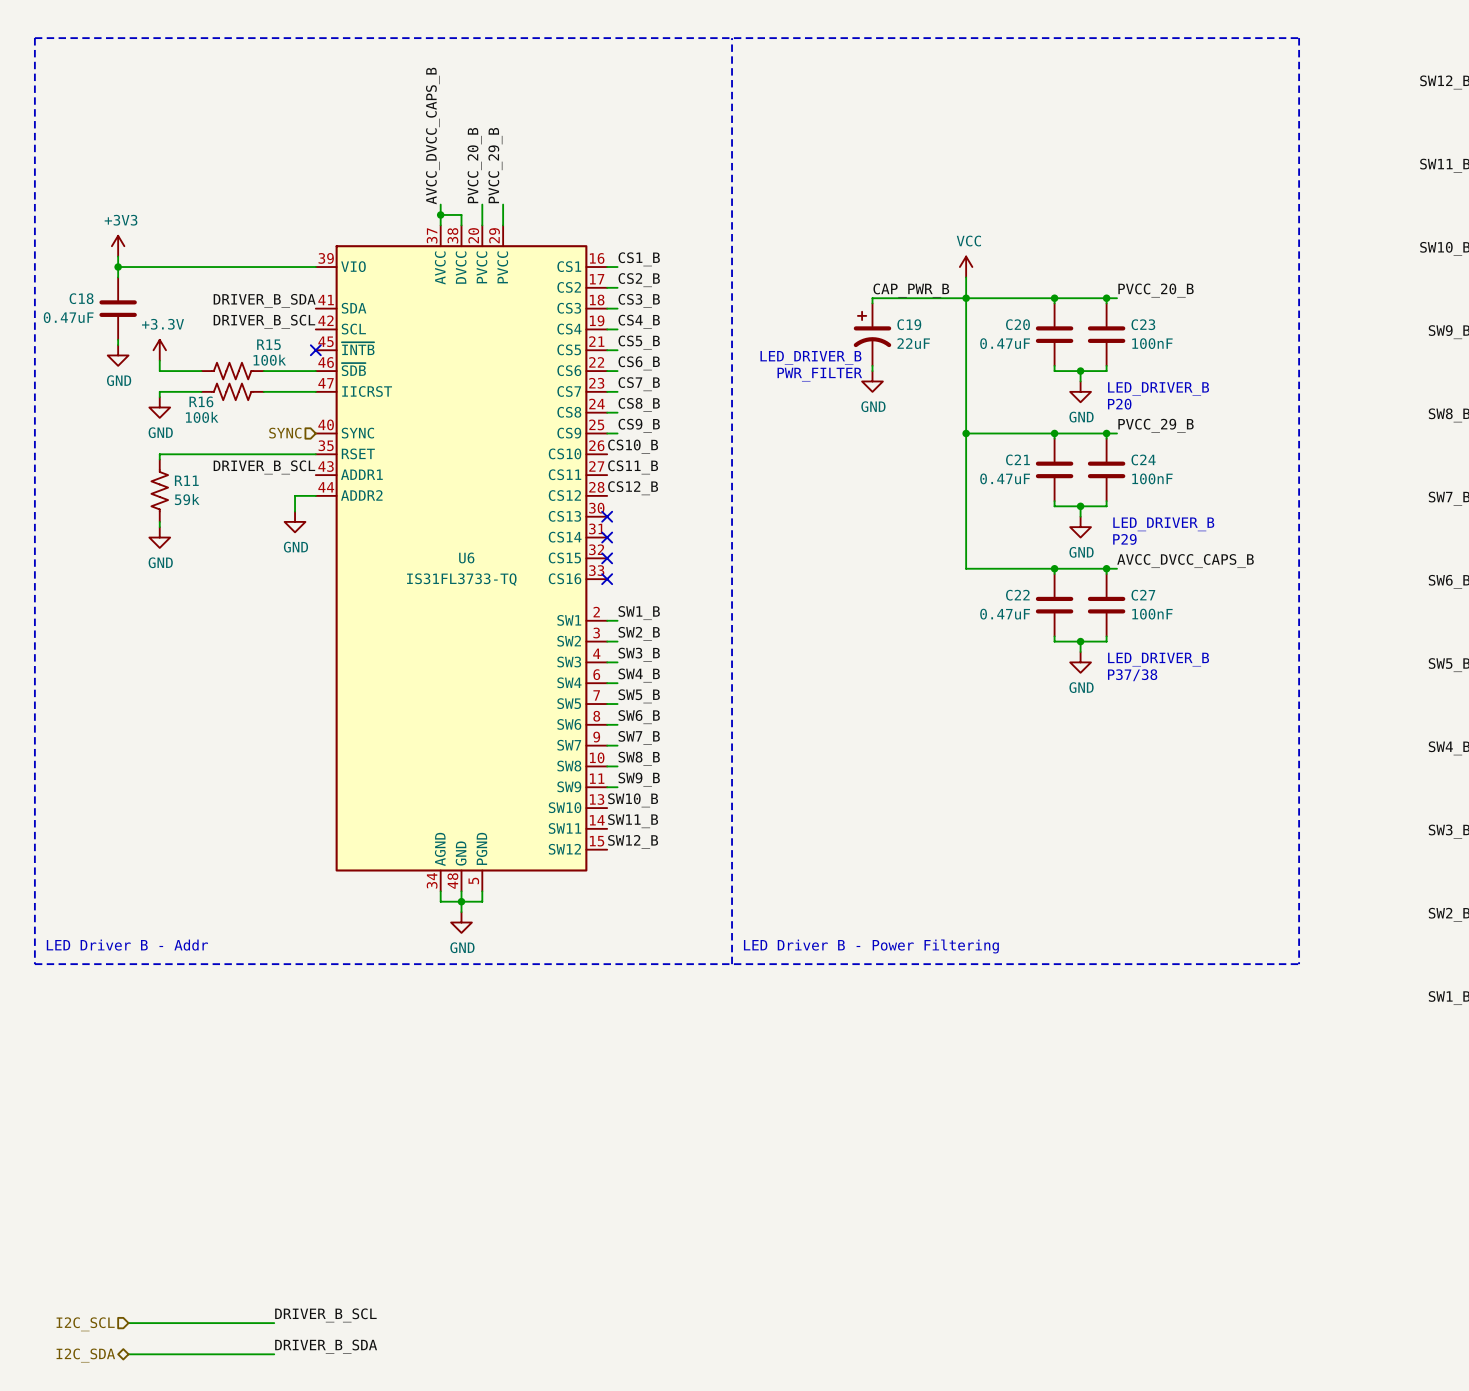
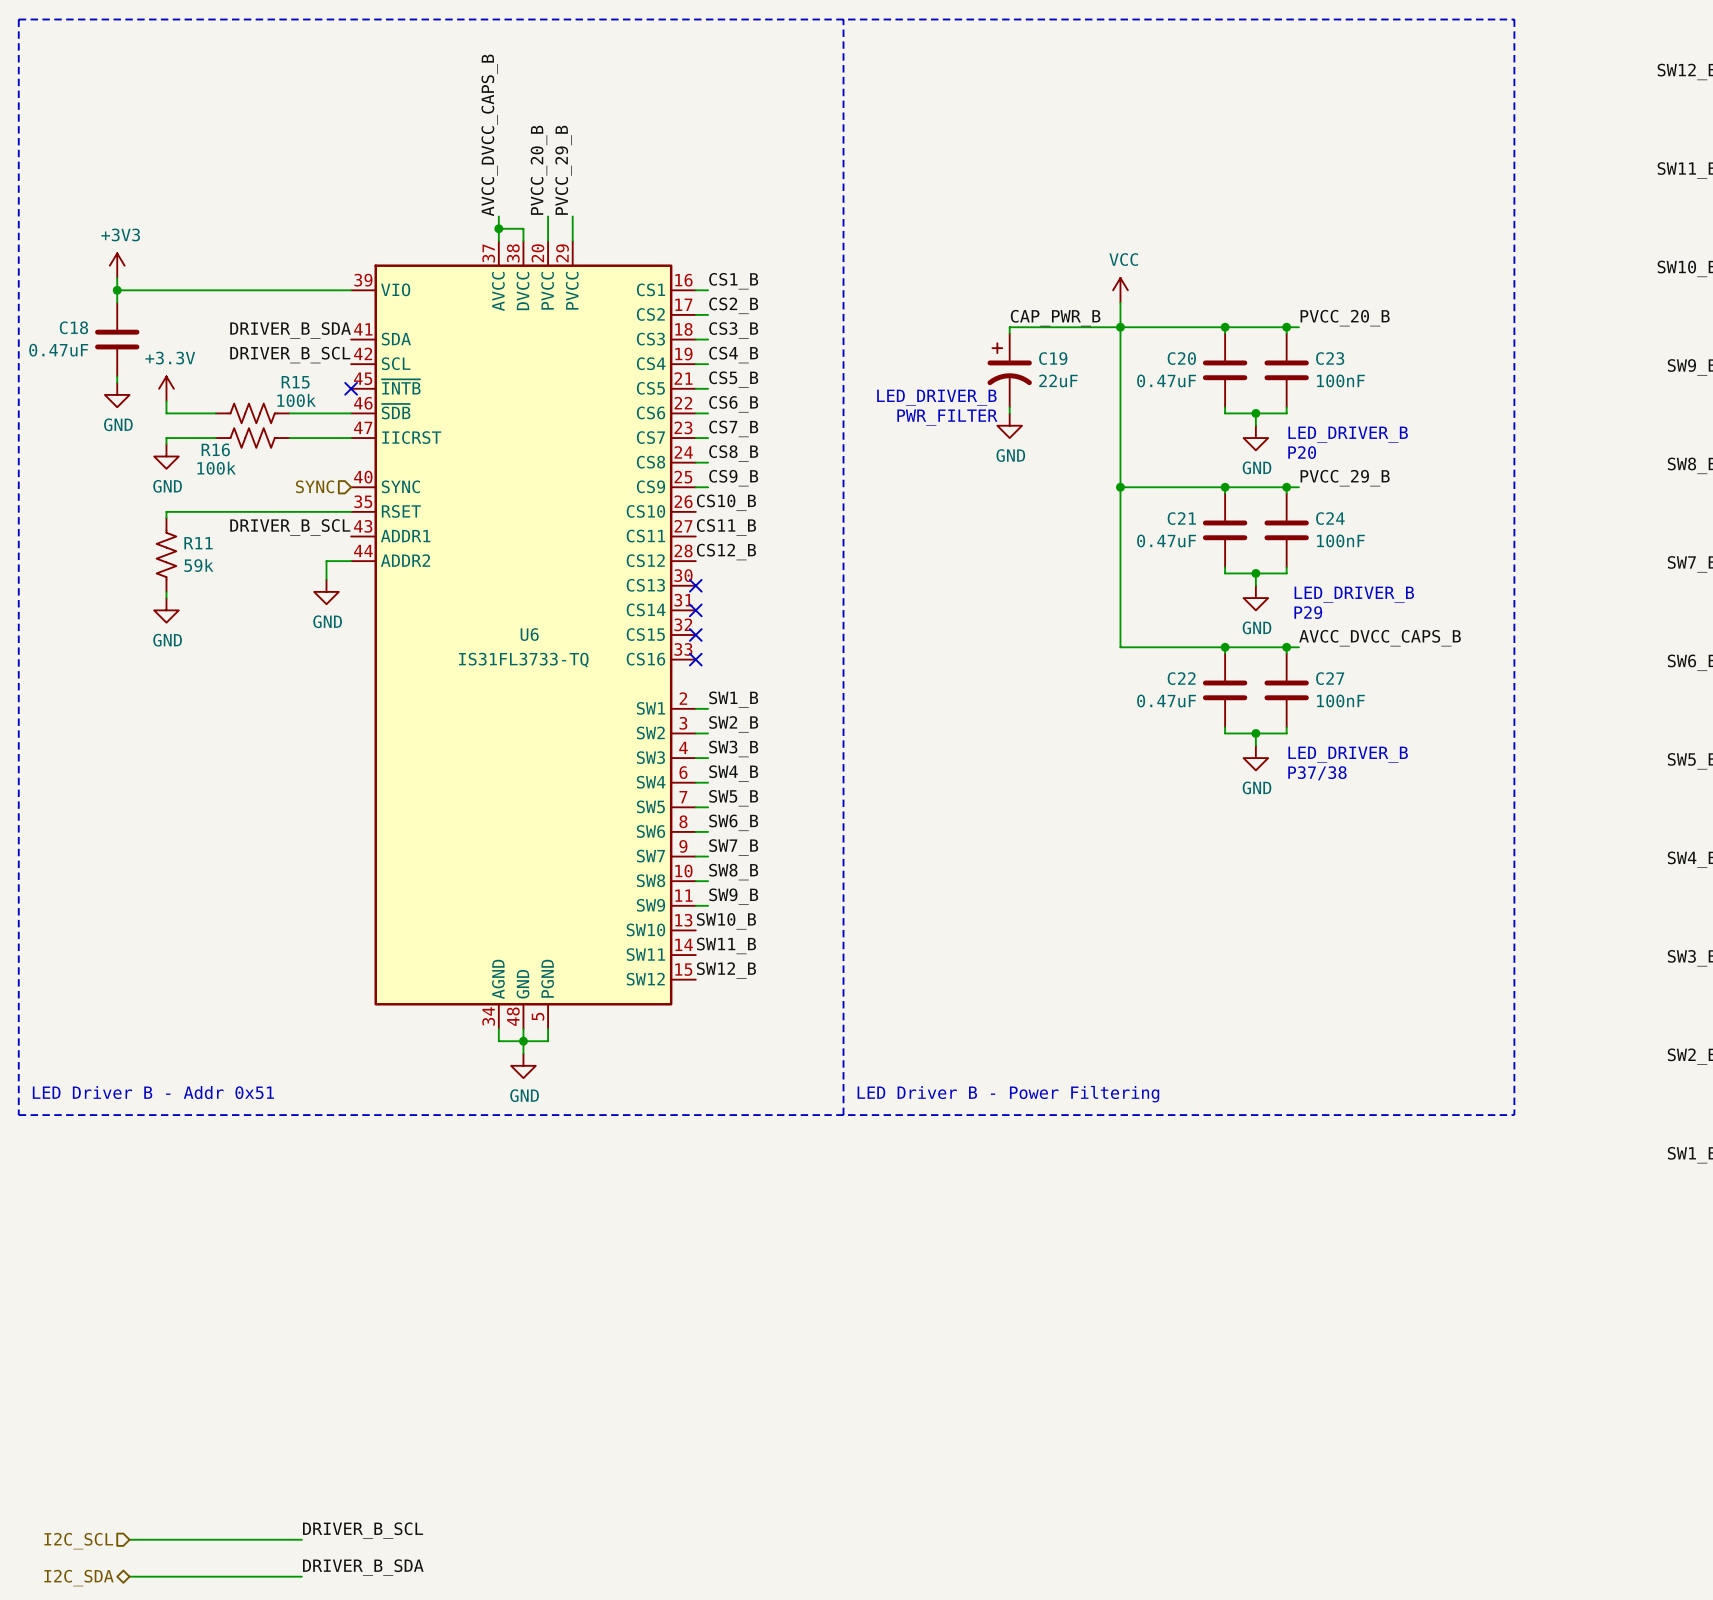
text: LED Driver B - Addr (127, 945) -> LED Driver B - Addr 0x51 (153, 1092)

